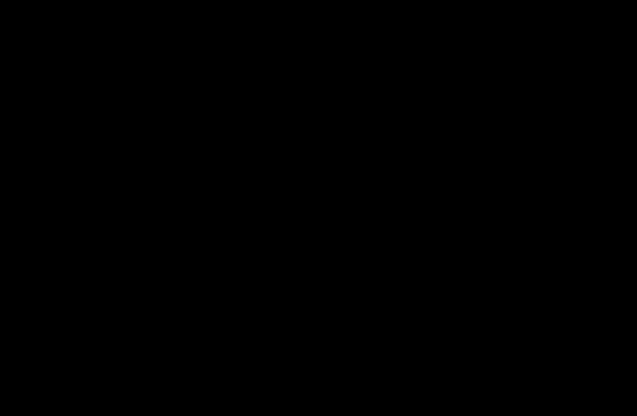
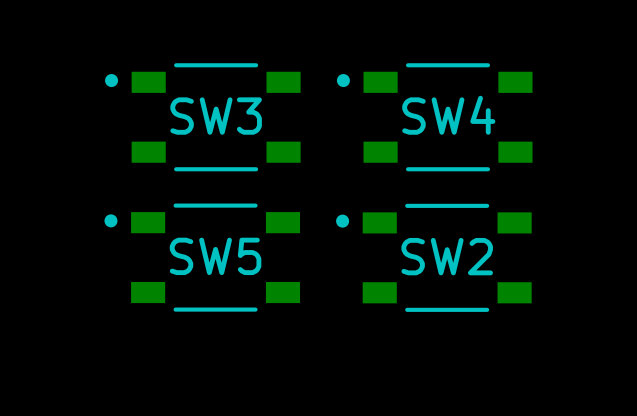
SW3: none -> (202, 117)
SW4: none -> (434, 117)
SW5: none -> (202, 257)
SW2: none -> (433, 257)

